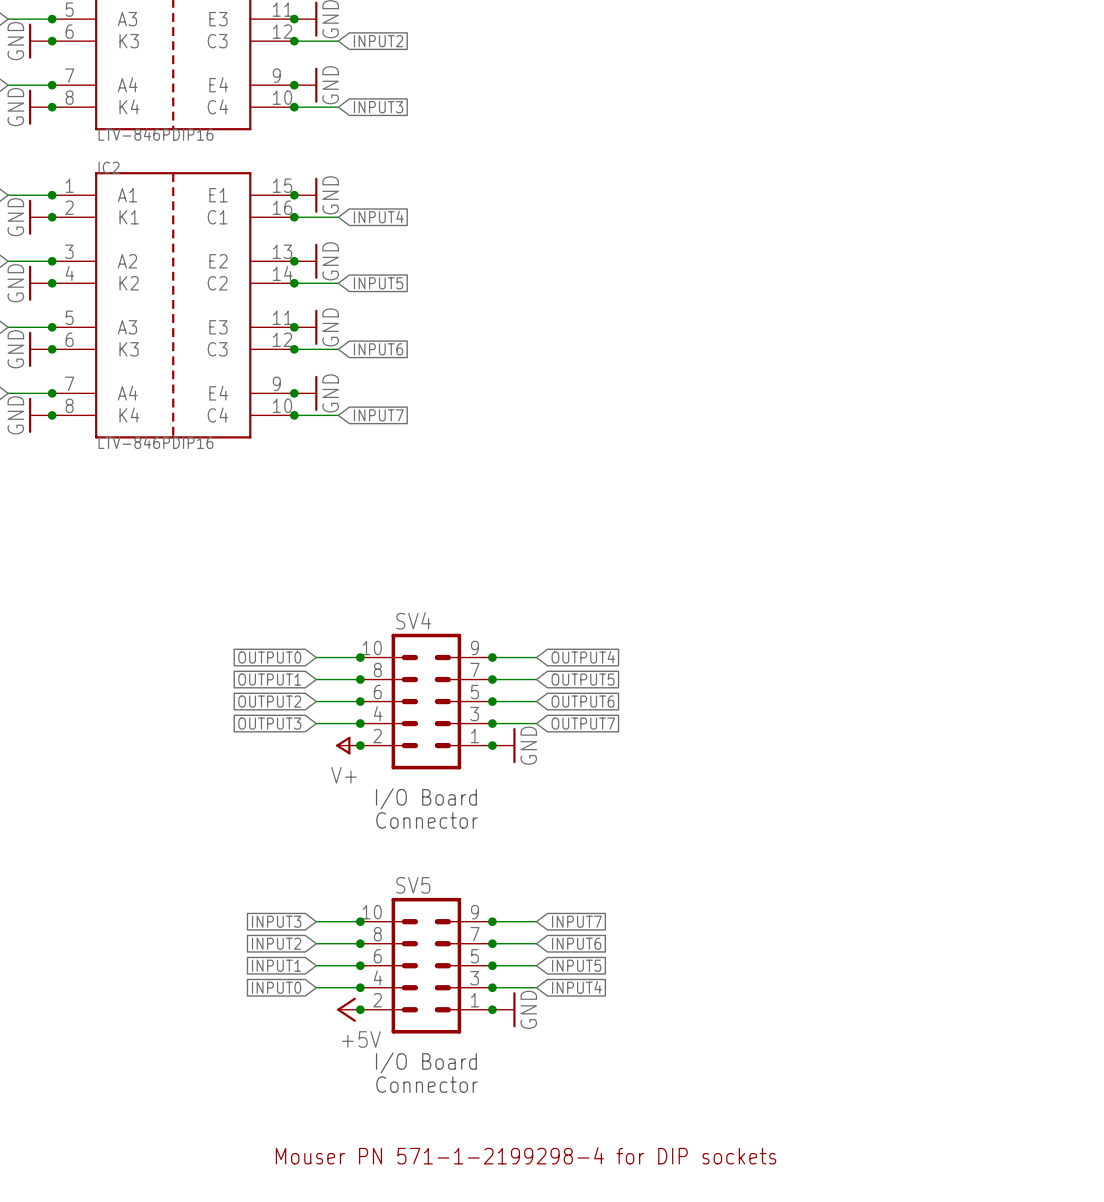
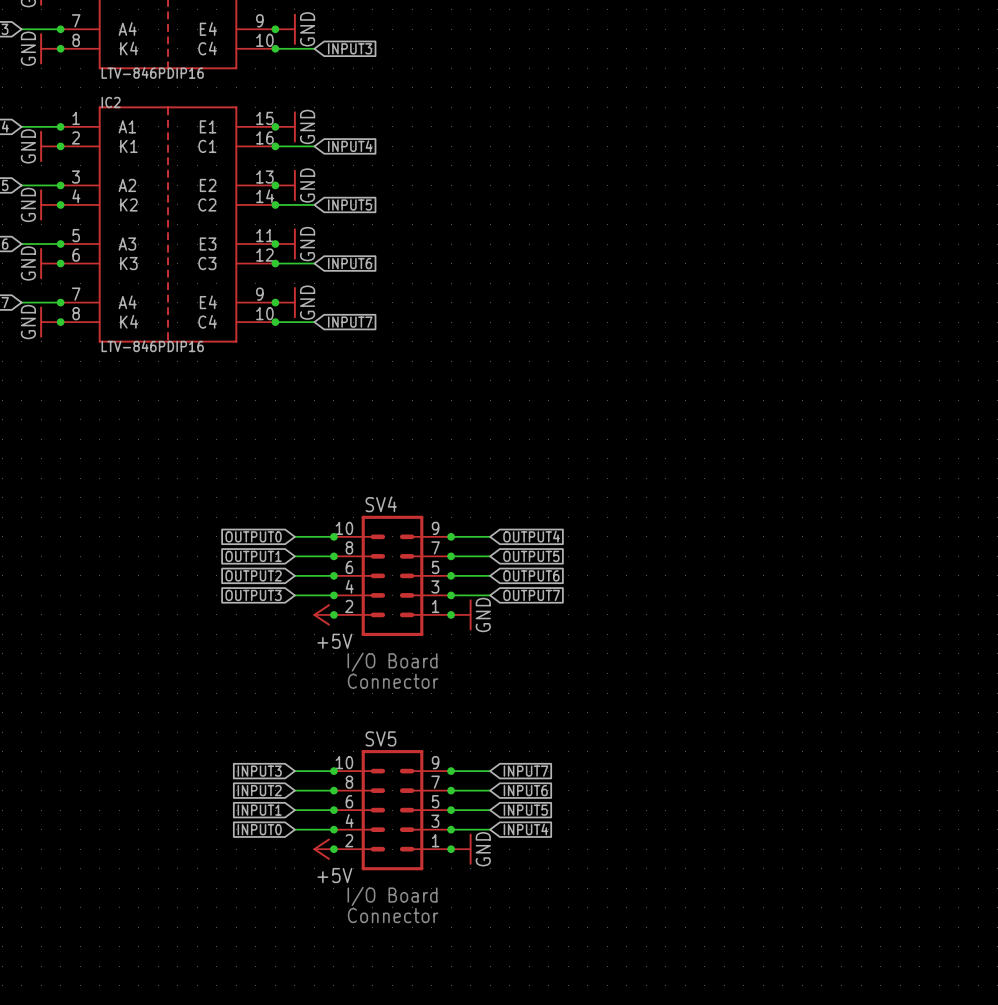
power symbol: V+ (348, 745) -> +5V (323, 614)
text: Mouser PN 571-1-2199298-4 for DIP sockets (526, 1155) -> none

